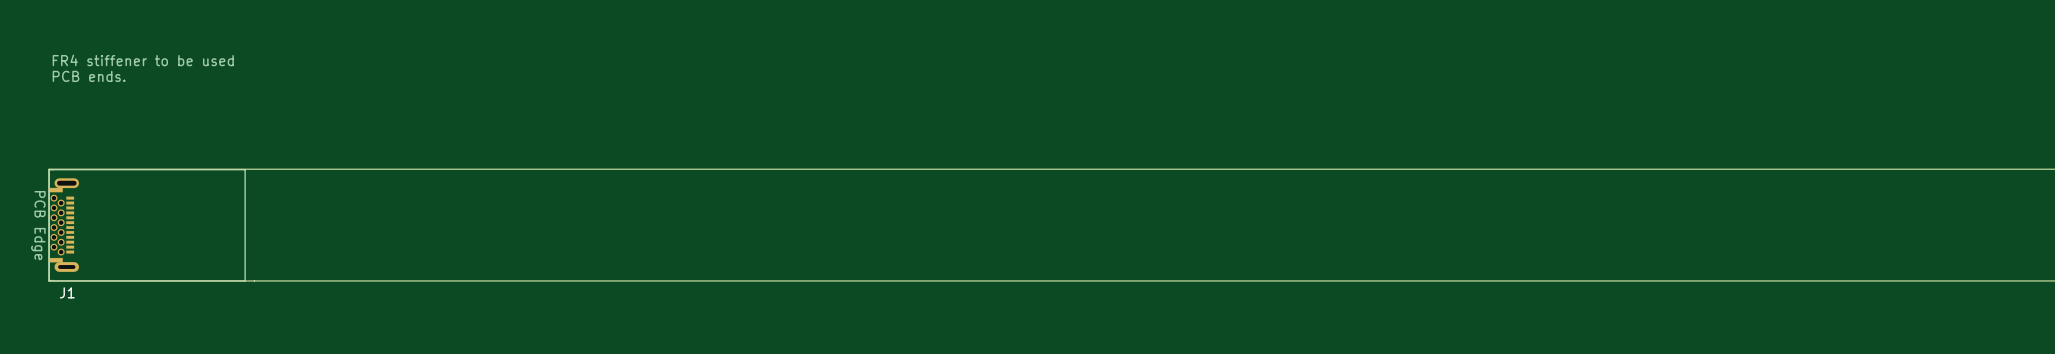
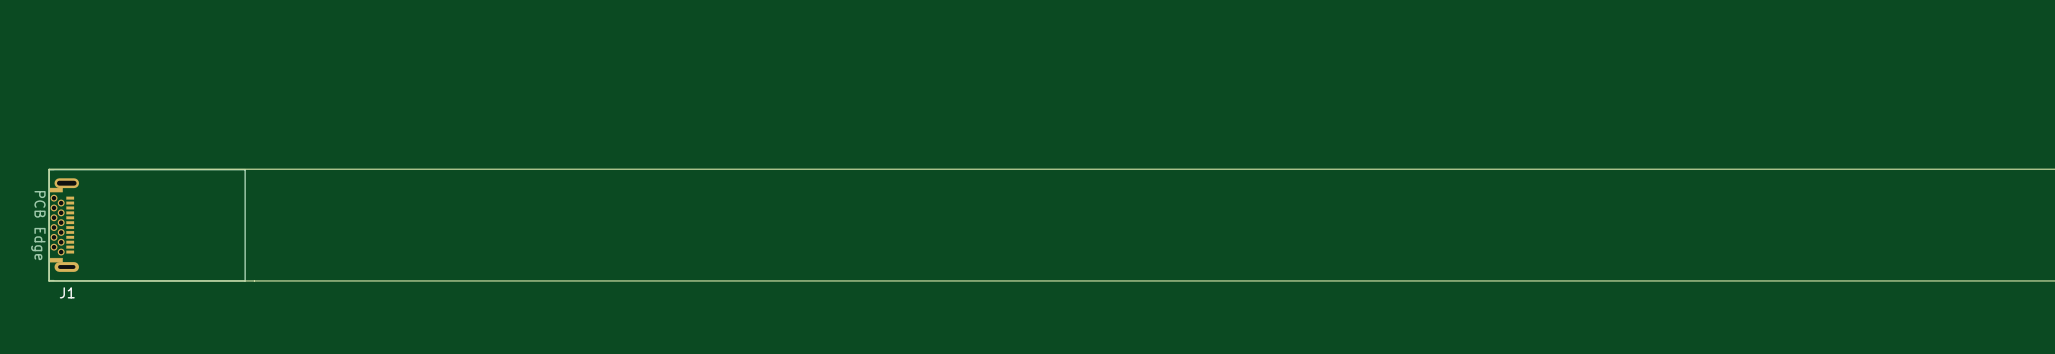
text: FR4 stiffener to be used (143, 60) -> none
text: PCB ends. (89, 76) -> none

